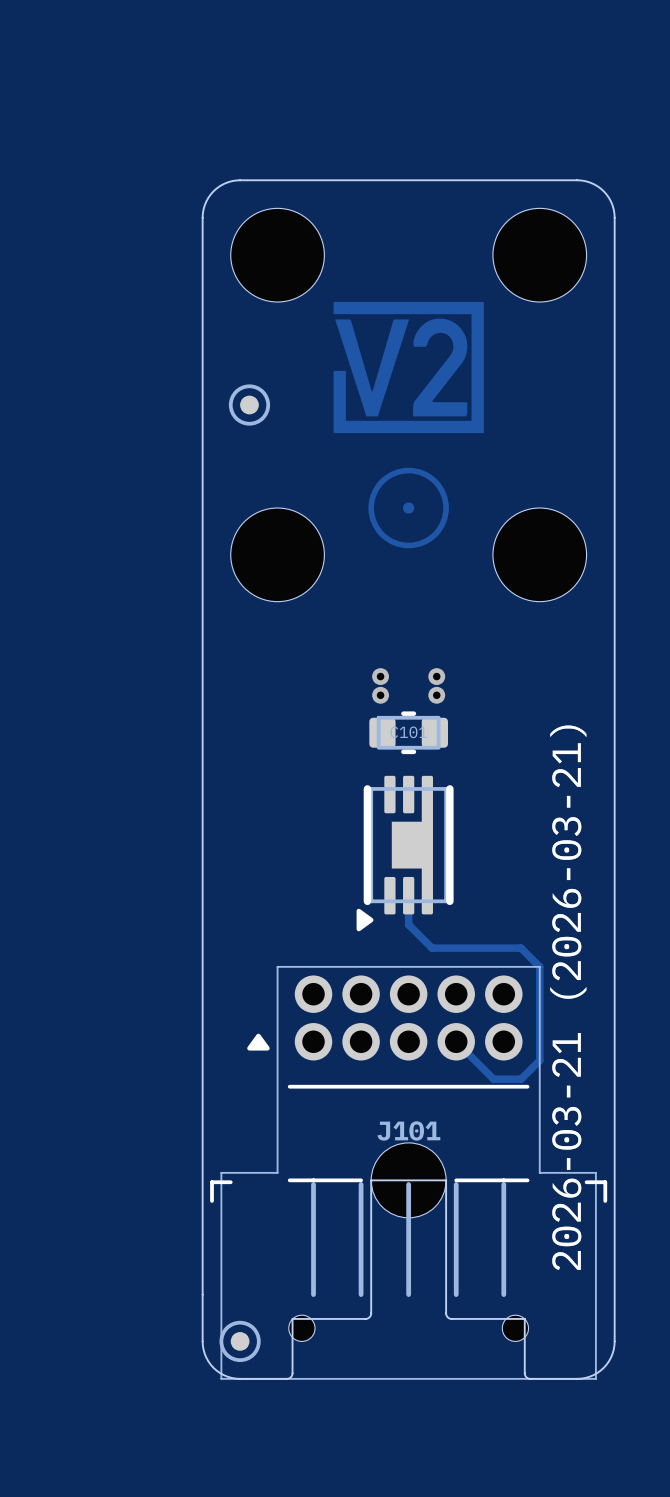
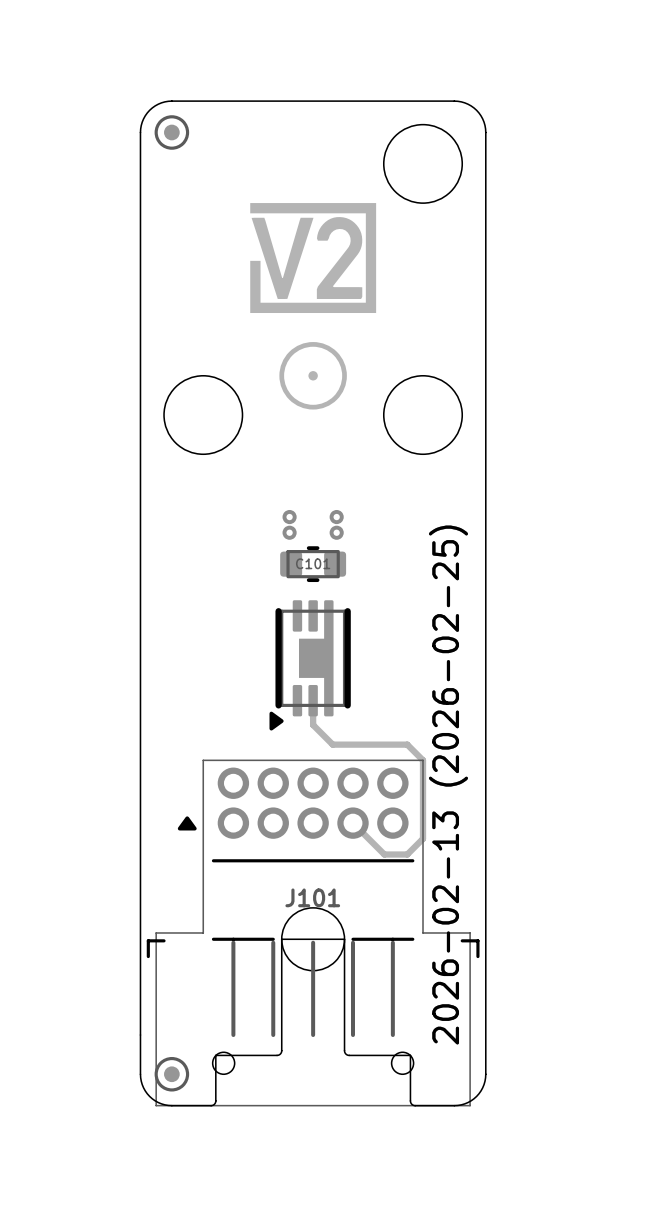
part: (277, 255) -> none
part position: (249, 405) -> (171, 132)
drawing shape: [550, 725, 587, 1271] -> [428, 525, 468, 1045]

